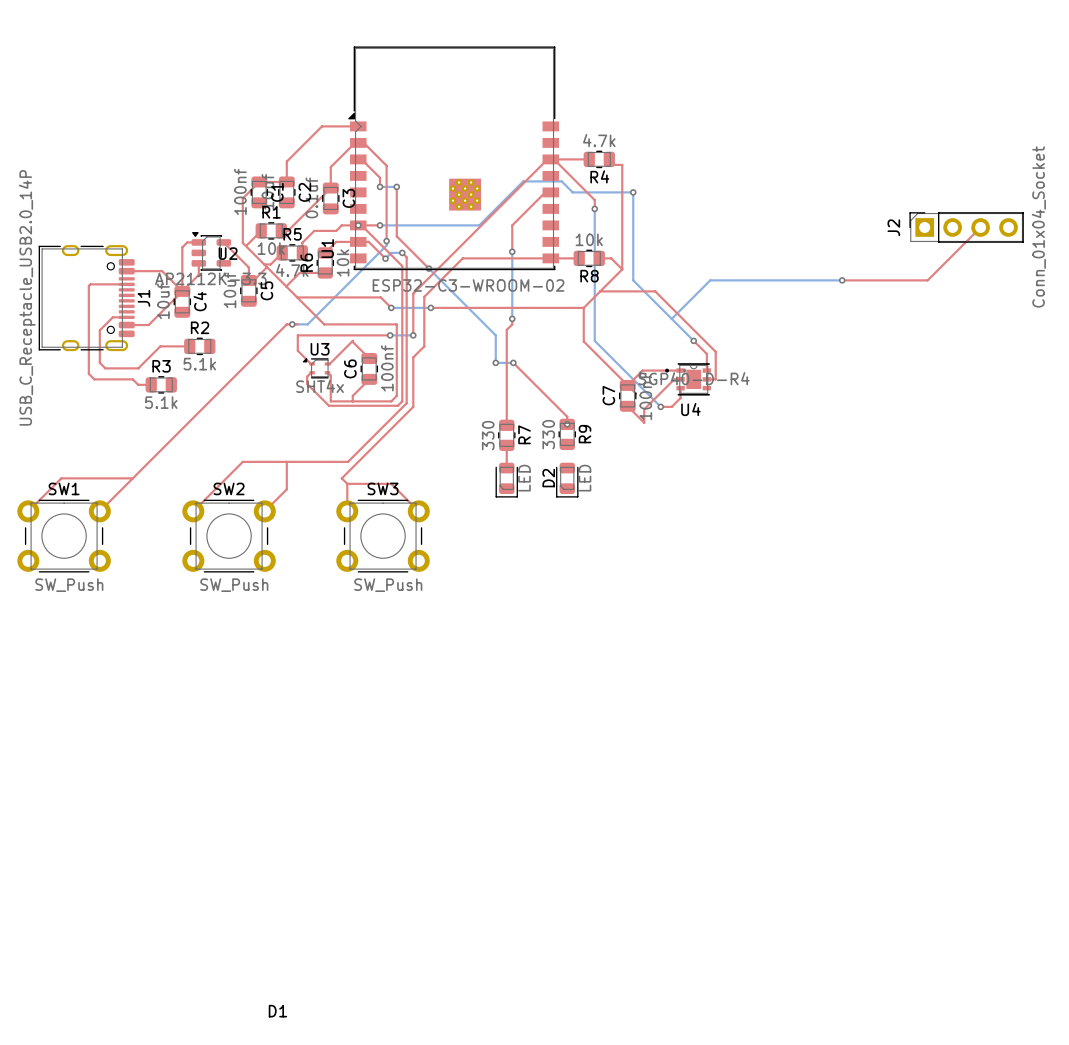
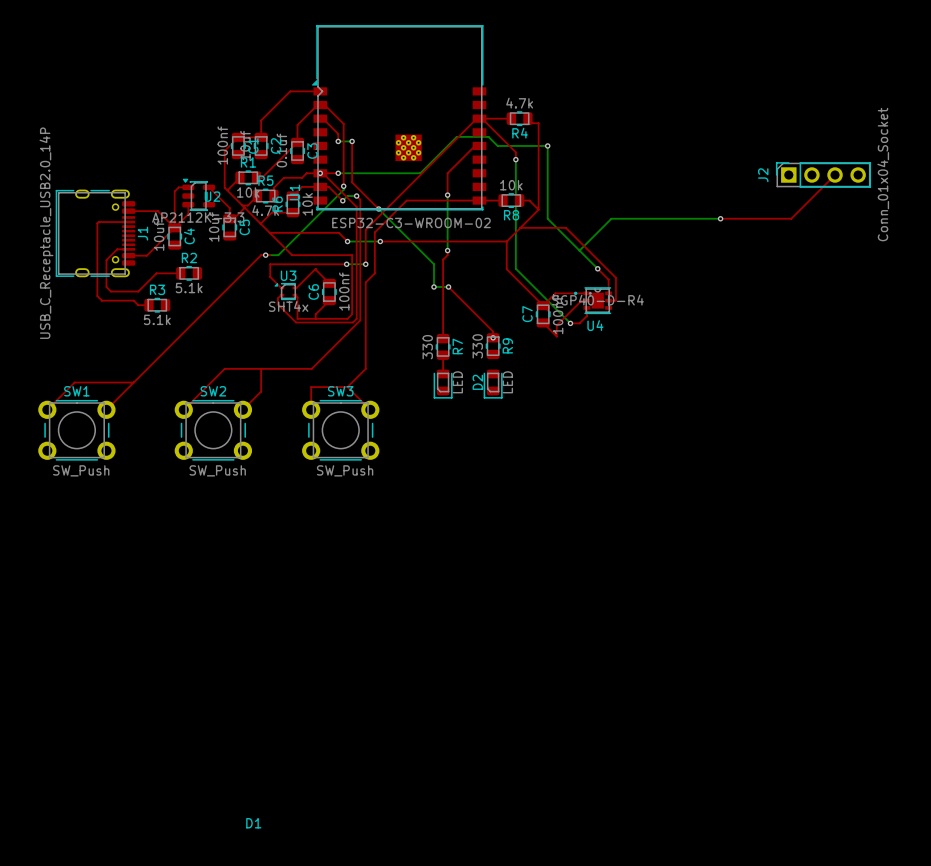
top track: (413, 406) (341, 478) (347, 483) -> (365, 323) (365, 368) (347, 387)

